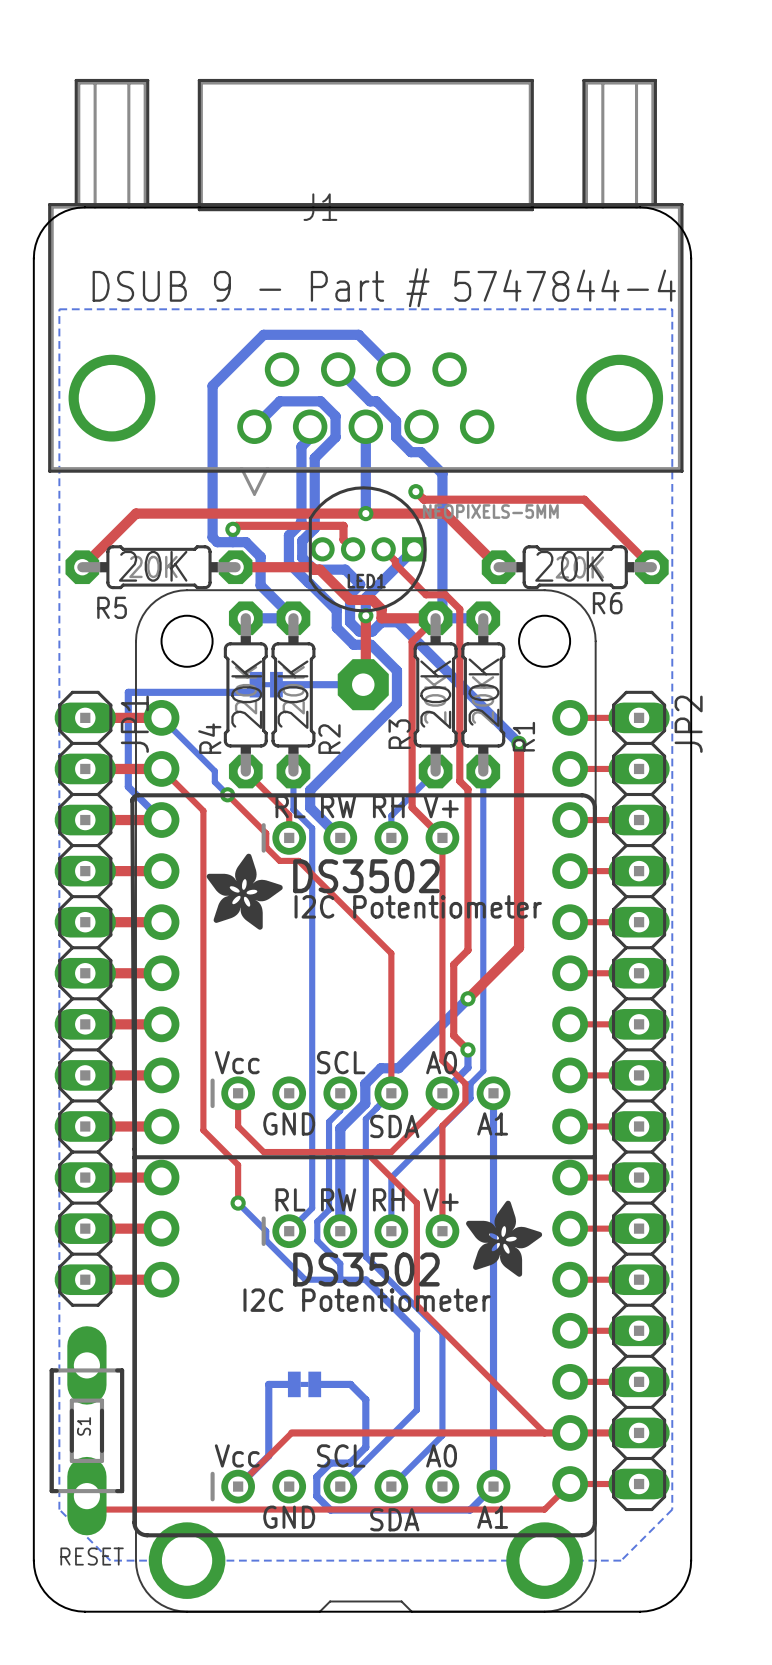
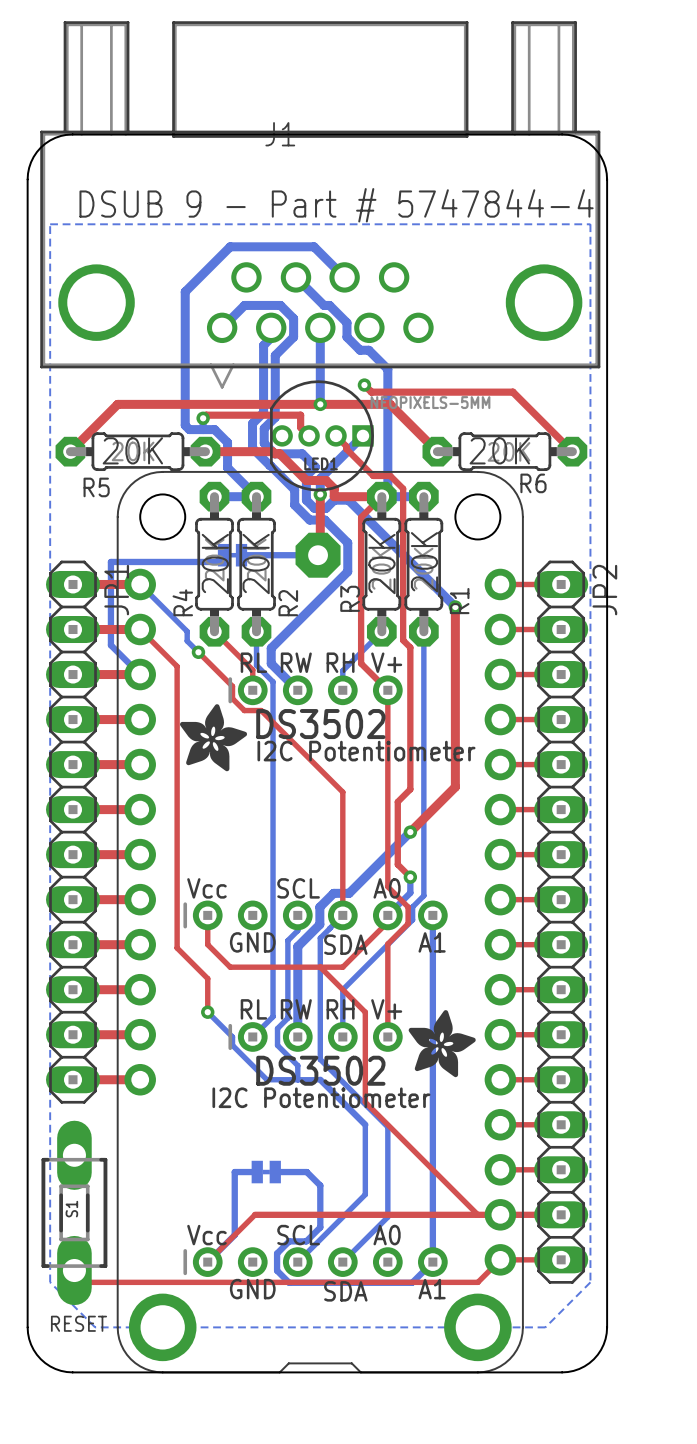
line: (132, 799) (134, 1149) (134, 1522) (136, 1528) (140, 1533) (147, 1535) (582, 1535) (588, 1533) (593, 1528) (594, 1522) (594, 808) (593, 801) (588, 797) (582, 795) (138, 795) (134, 797) (132, 799) (132, 799) (132, 800) (132, 801) -> none
line: (134, 1157) (594, 1157) -> none

